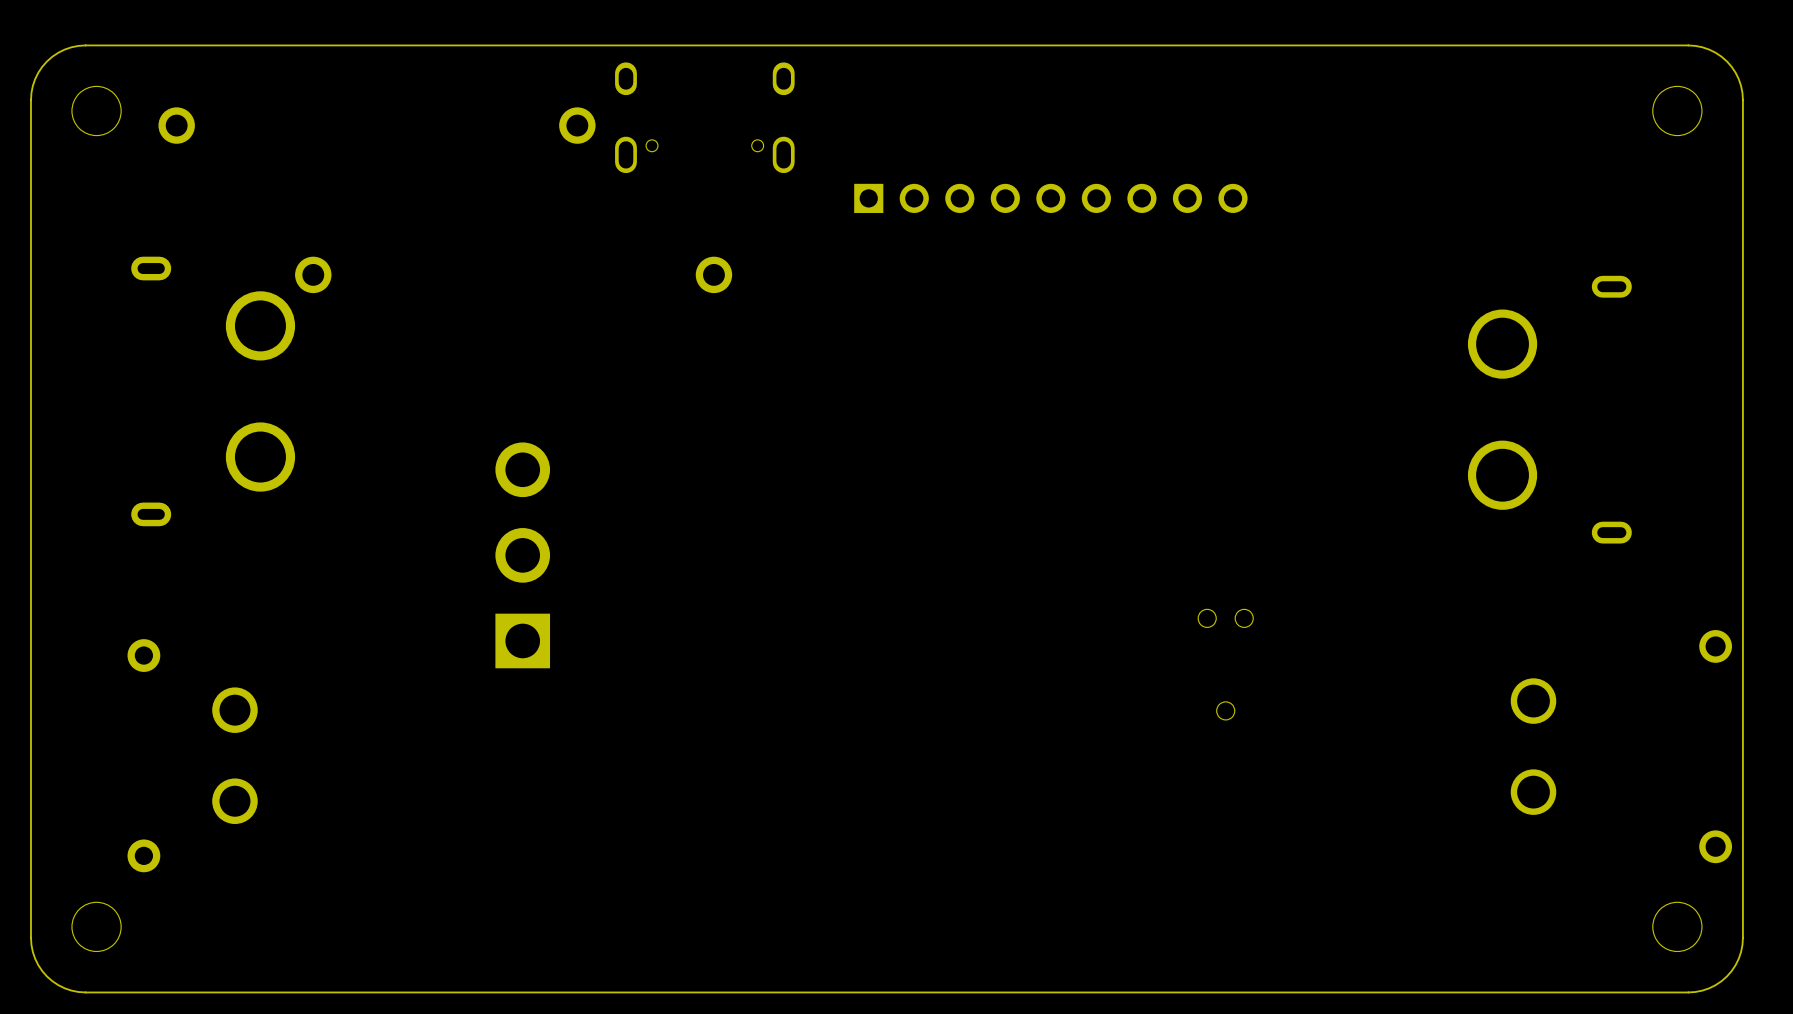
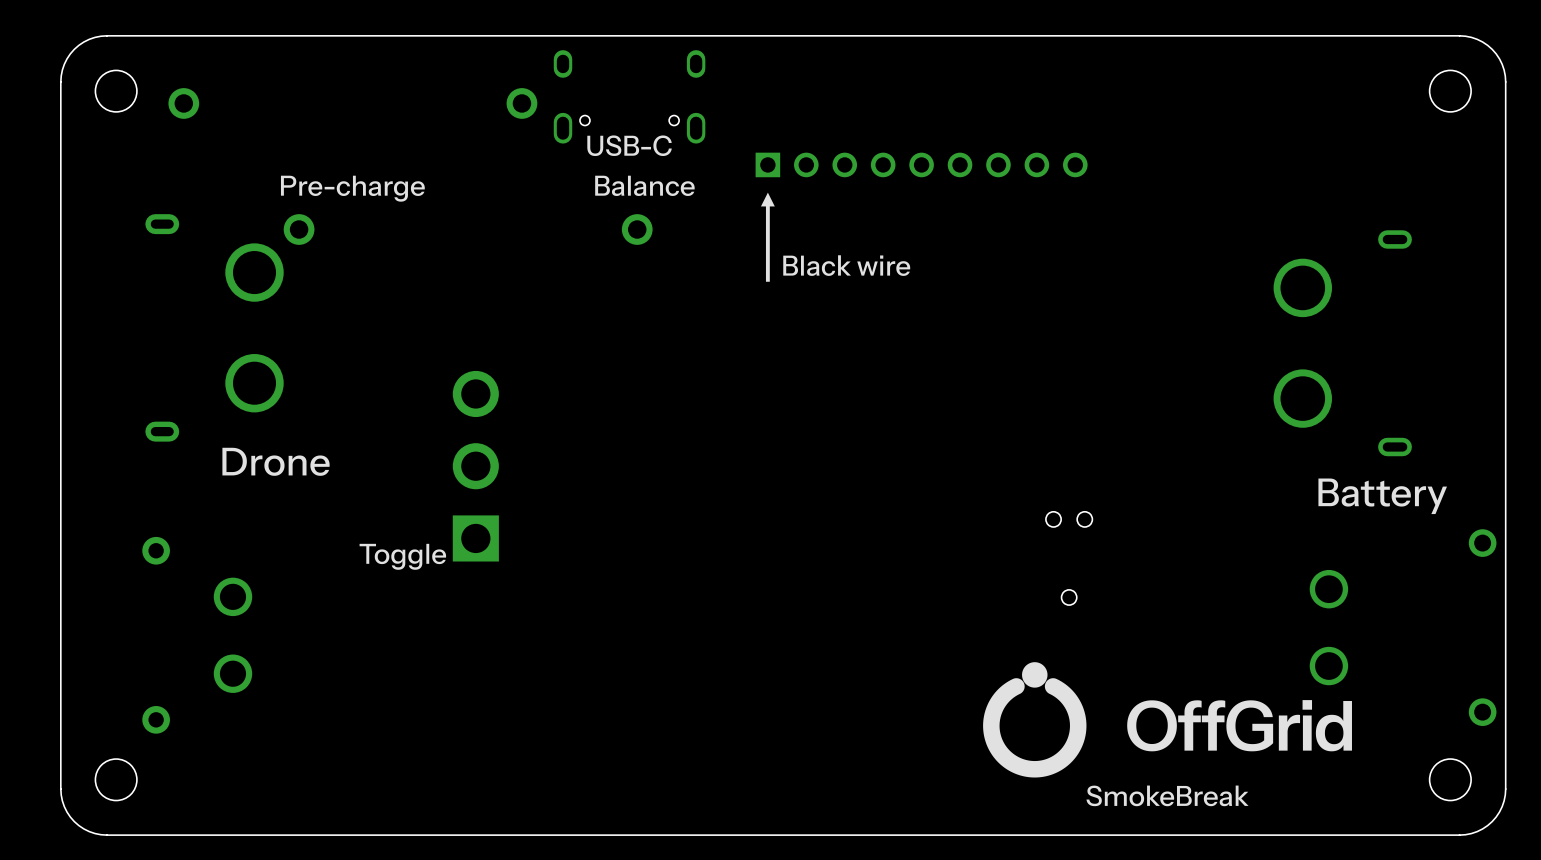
drawing: none -> [587, 135, 672, 157]
drawing: none -> [280, 175, 425, 202]
drawing: none -> [595, 175, 695, 196]
drawing: none -> [760, 192, 911, 282]
drawing: none -> [222, 447, 330, 476]
drawing: none -> [1318, 478, 1448, 515]
drawing: none -> [359, 543, 447, 570]
drawing: none -> [983, 662, 1249, 807]
drawing: none -> [1127, 700, 1352, 752]

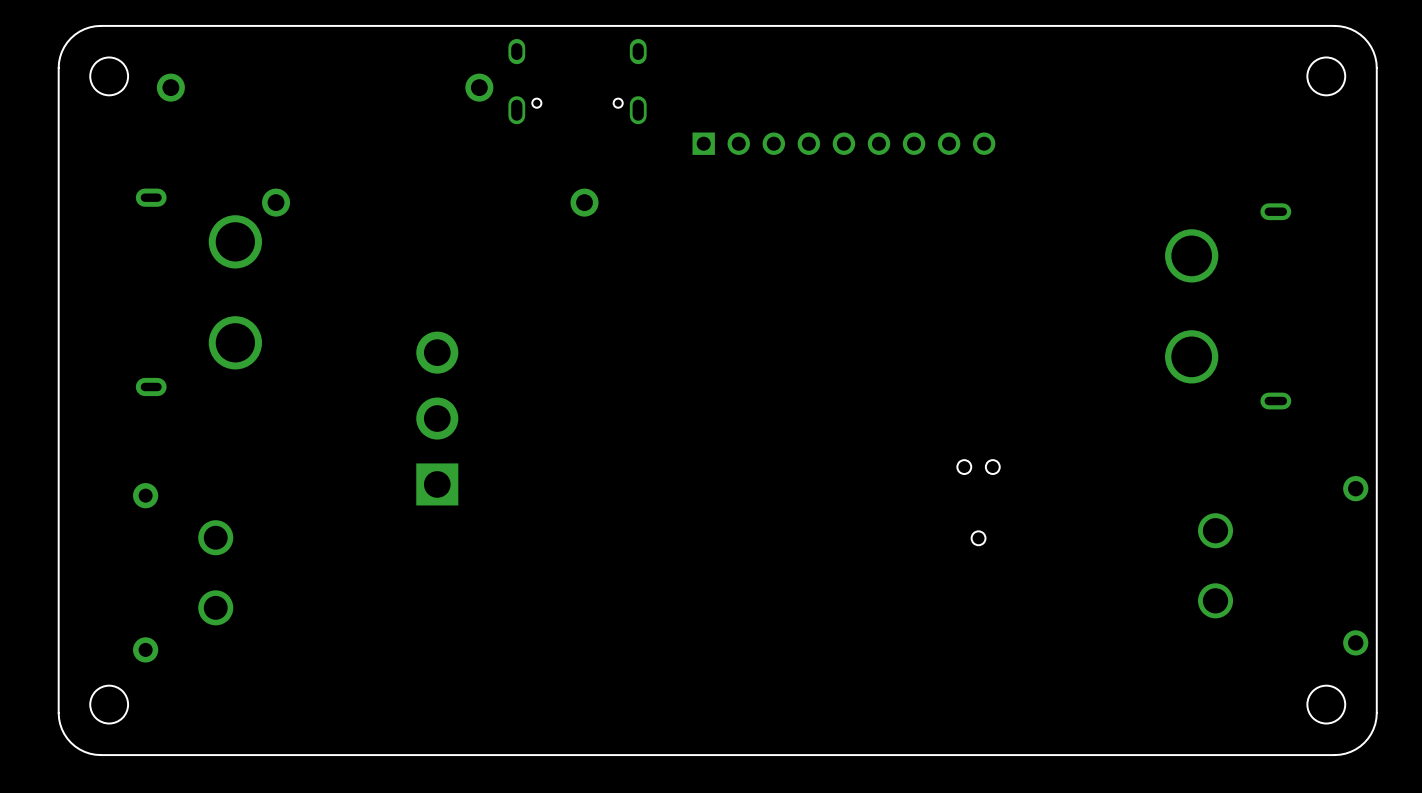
drawing: [587, 135, 672, 157] -> none
drawing: [280, 175, 425, 202] -> none
drawing: [595, 175, 695, 196] -> none
drawing: [760, 192, 911, 282] -> none
drawing: [222, 447, 330, 476] -> none
drawing: [1318, 478, 1448, 515] -> none
drawing: [359, 543, 447, 570] -> none
drawing: [983, 662, 1249, 807] -> none
drawing: [1127, 700, 1352, 752] -> none

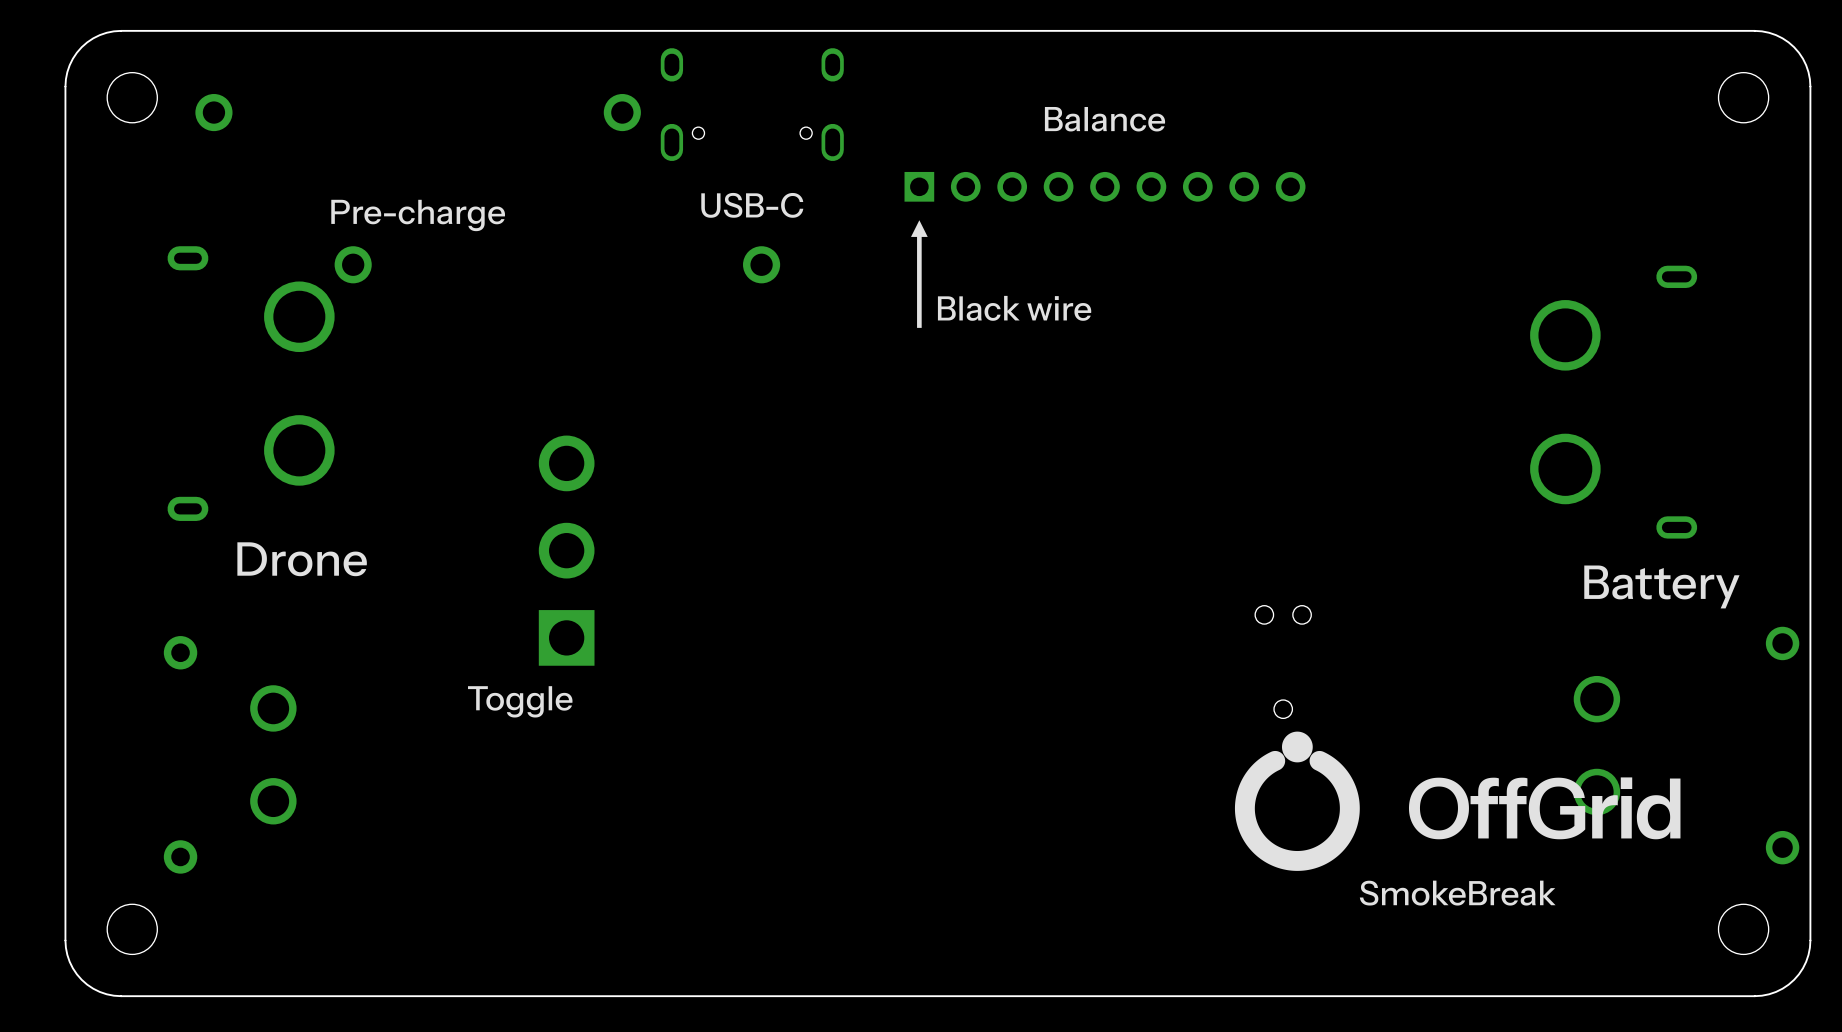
drawing: none -> [1044, 106, 1166, 132]
drawing: none -> [701, 192, 804, 218]
drawing: none -> [331, 199, 506, 232]
drawing: none -> [911, 220, 1092, 328]
drawing: none -> [237, 542, 367, 577]
drawing: none -> [1584, 565, 1740, 609]
drawing: none -> [468, 686, 573, 718]
drawing: none -> [1234, 731, 1556, 906]
drawing: none -> [1408, 777, 1681, 840]

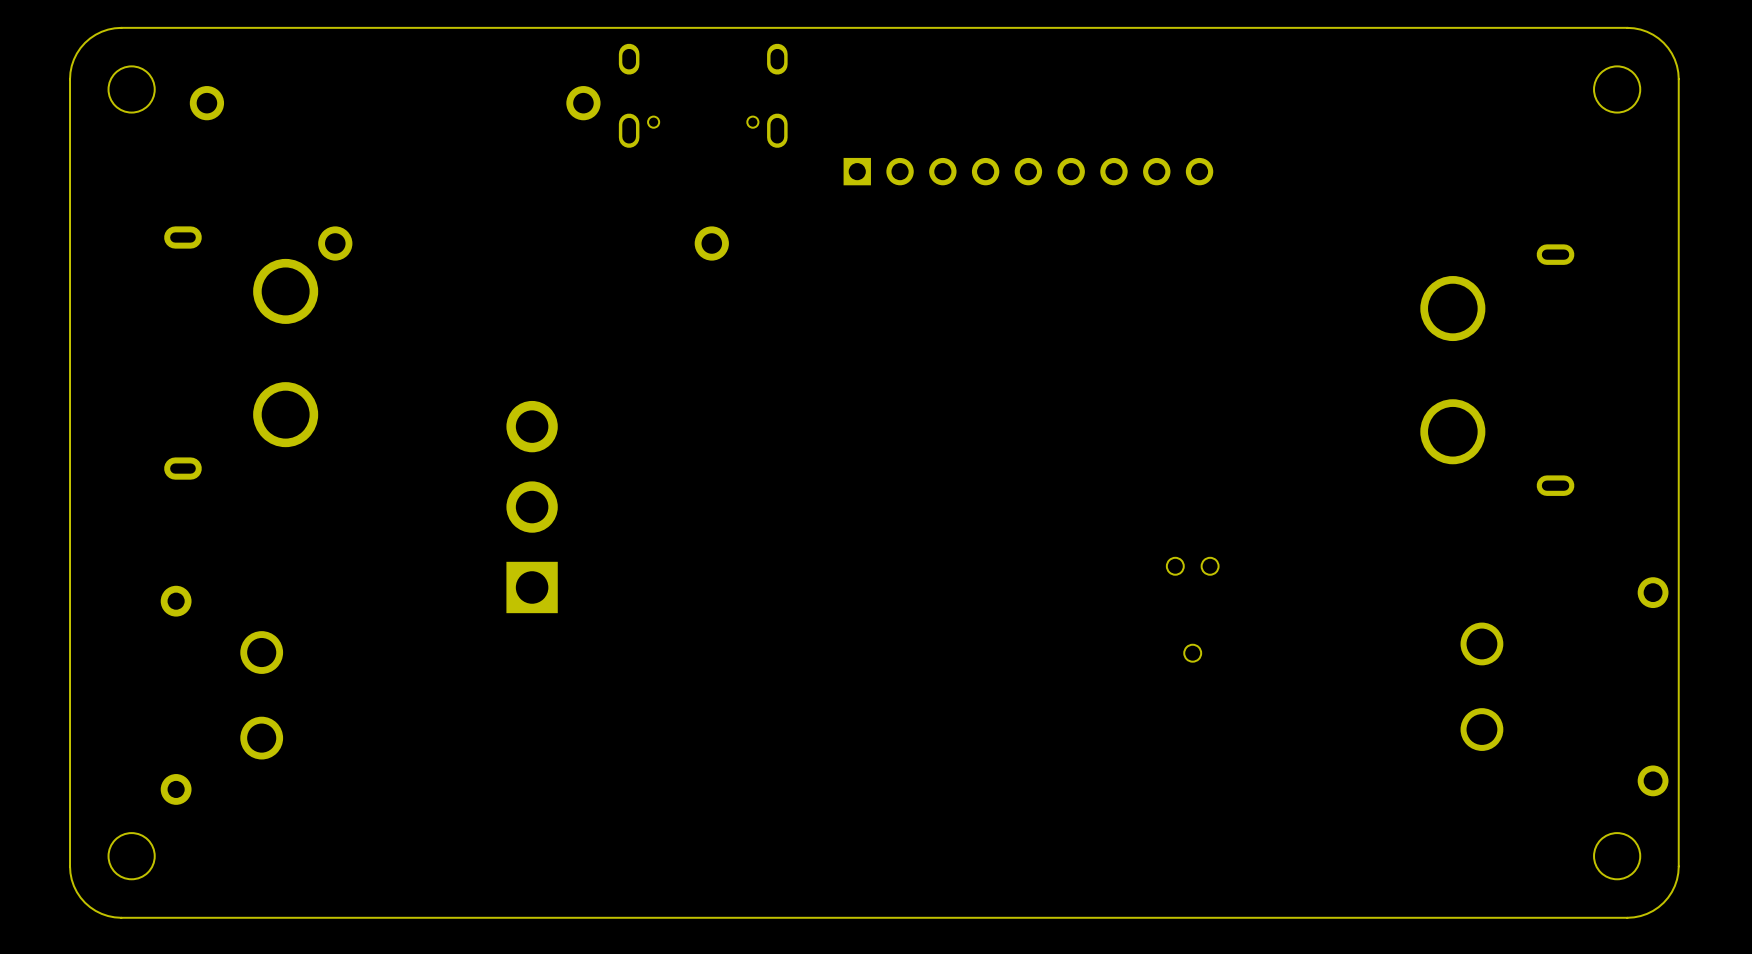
drawing: [1044, 106, 1166, 132] -> none
drawing: [701, 192, 804, 218] -> none
drawing: [331, 199, 506, 232] -> none
drawing: [911, 220, 1092, 328] -> none
drawing: [237, 542, 367, 577] -> none
drawing: [1584, 565, 1740, 609] -> none
drawing: [468, 686, 573, 718] -> none
drawing: [1234, 731, 1556, 906] -> none
drawing: [1408, 777, 1681, 840] -> none

